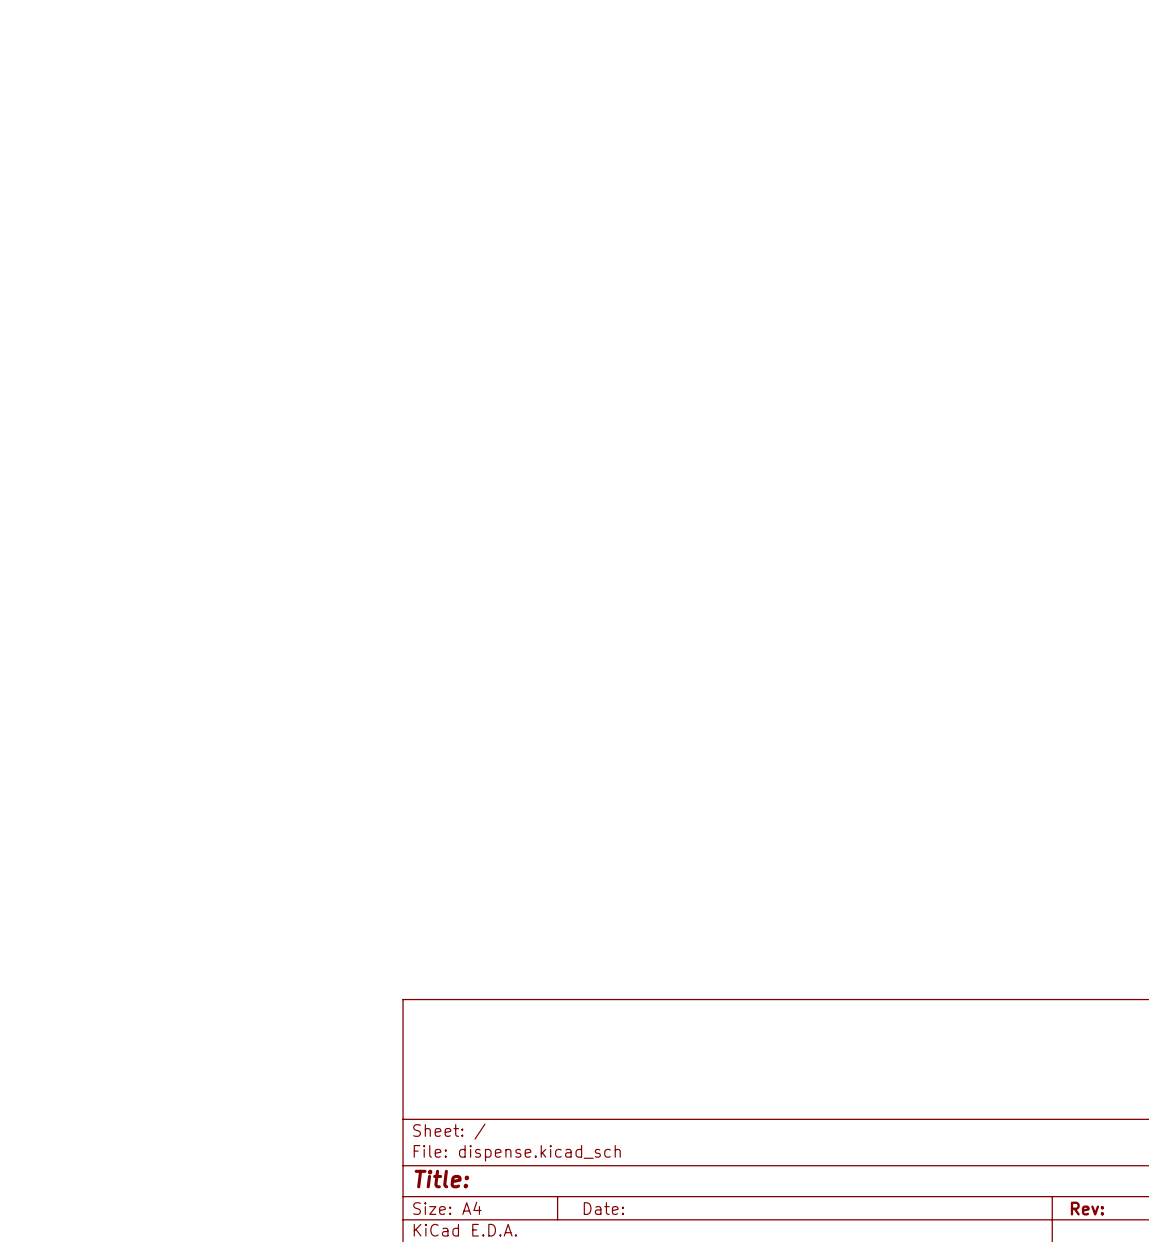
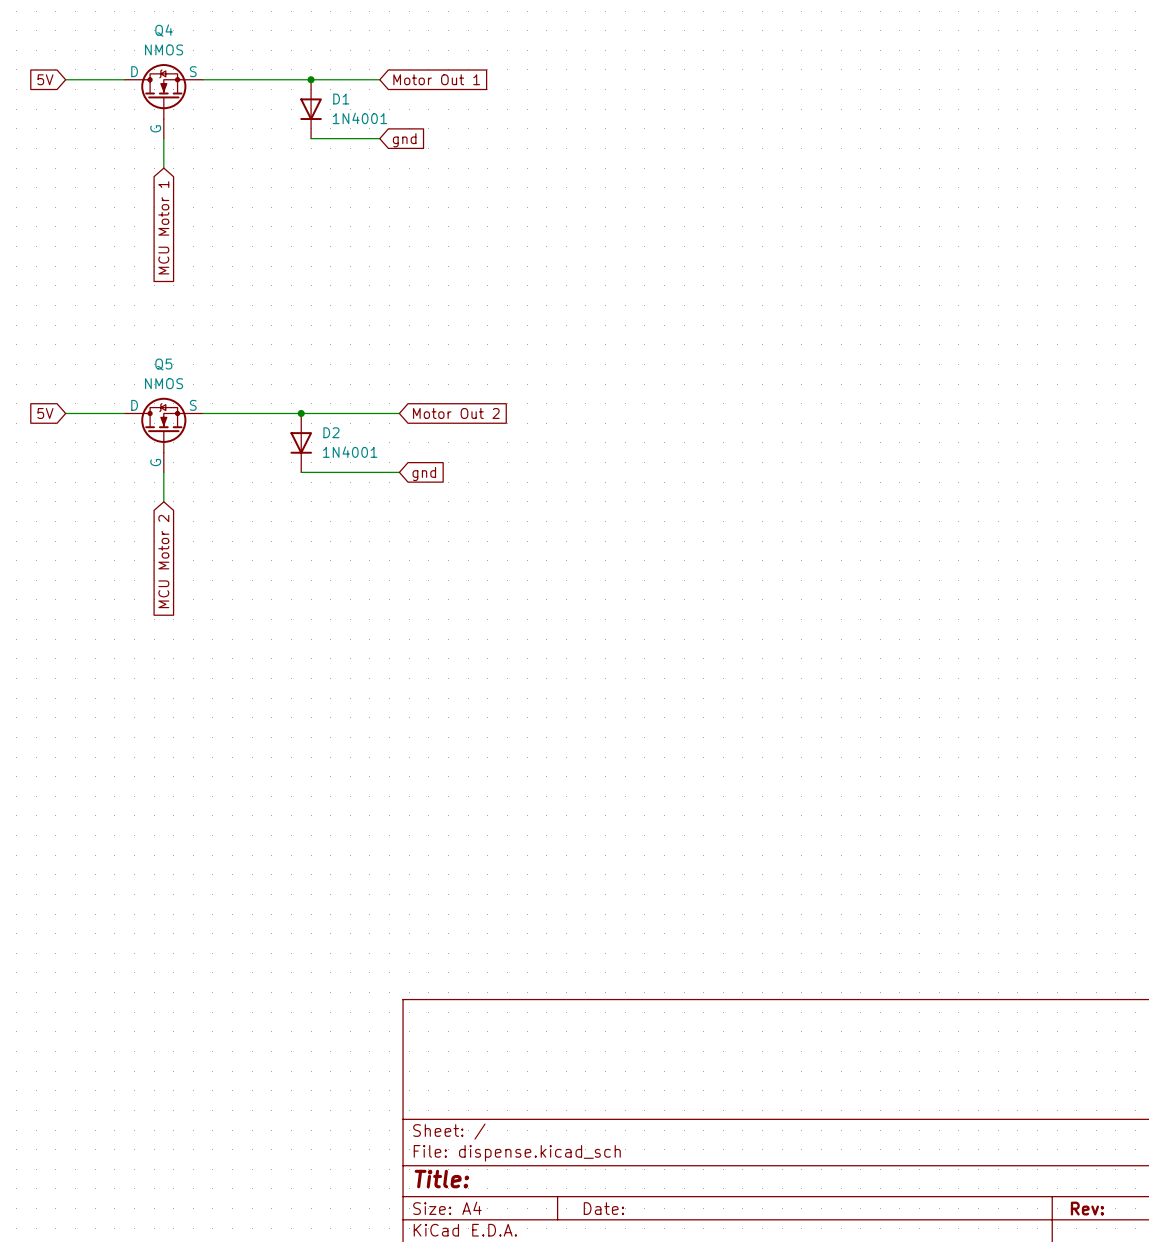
global label: none -> 5V (45, 79)
wire: none -> (65, 79) (124, 79)
wire: none -> (203, 79) (379, 79)
junction: none -> (311, 79)
global label: none -> Motor Out 1 (436, 79)
Q4: none -> NMOS (163, 101)
D1: none -> 1N4001 (311, 109)
wire: none -> (163, 138) (163, 168)
wire: none -> (311, 138) (379, 138)
global label: none -> gnd (404, 140)
global label: none -> MCU Motor 1 (163, 227)
global label: none -> 5V (45, 413)
wire: none -> (65, 413) (124, 413)
wire: none -> (203, 413) (399, 413)
junction: none -> (301, 413)
global label: none -> Motor Out 2 (456, 413)
Q5: none -> NMOS (163, 435)
D2: none -> 1N4001 (301, 442)
wire: none -> (163, 472) (163, 501)
wire: none -> (301, 472) (399, 472)
global label: none -> gnd (424, 474)
global label: none -> MCU Motor 2 (163, 561)

